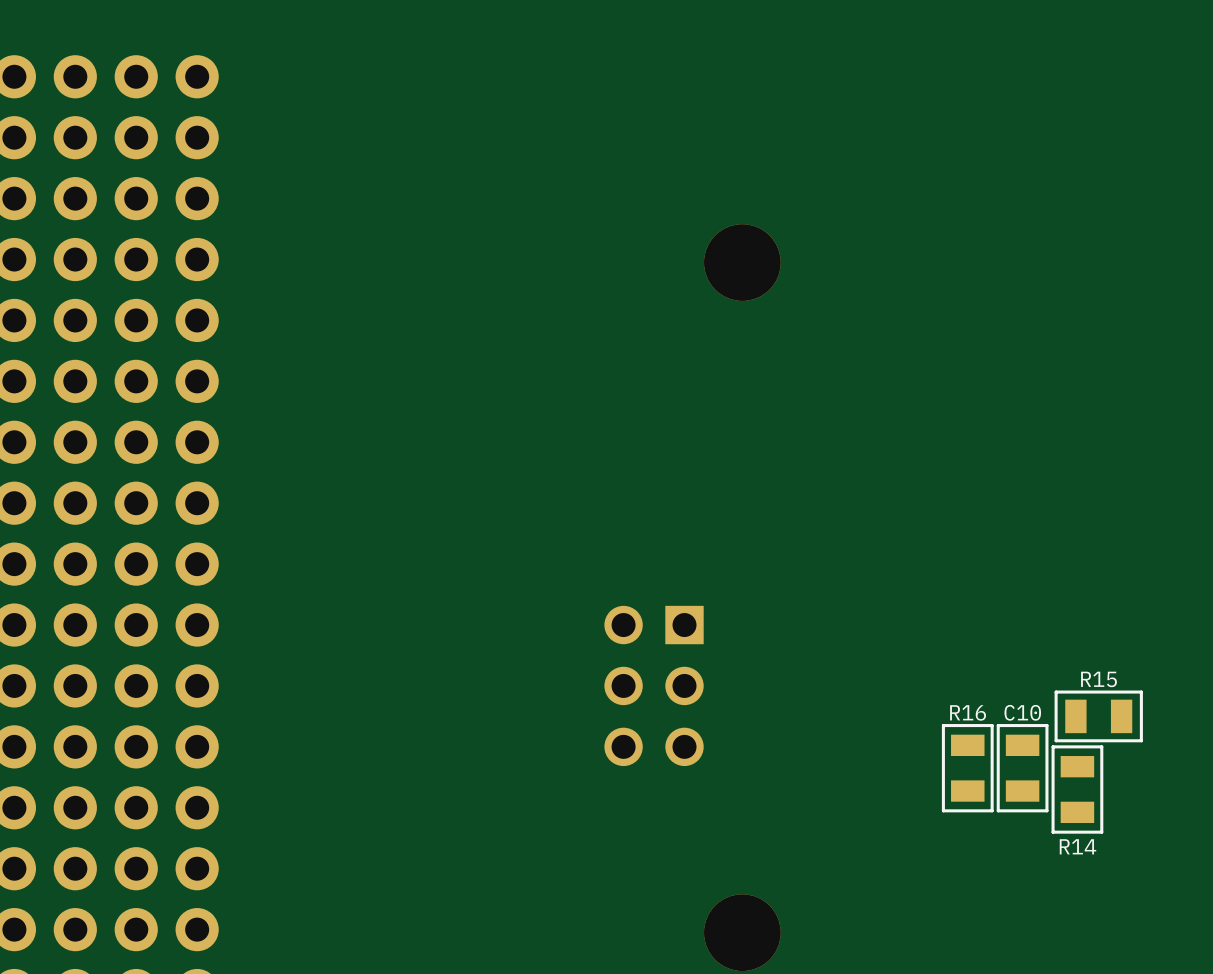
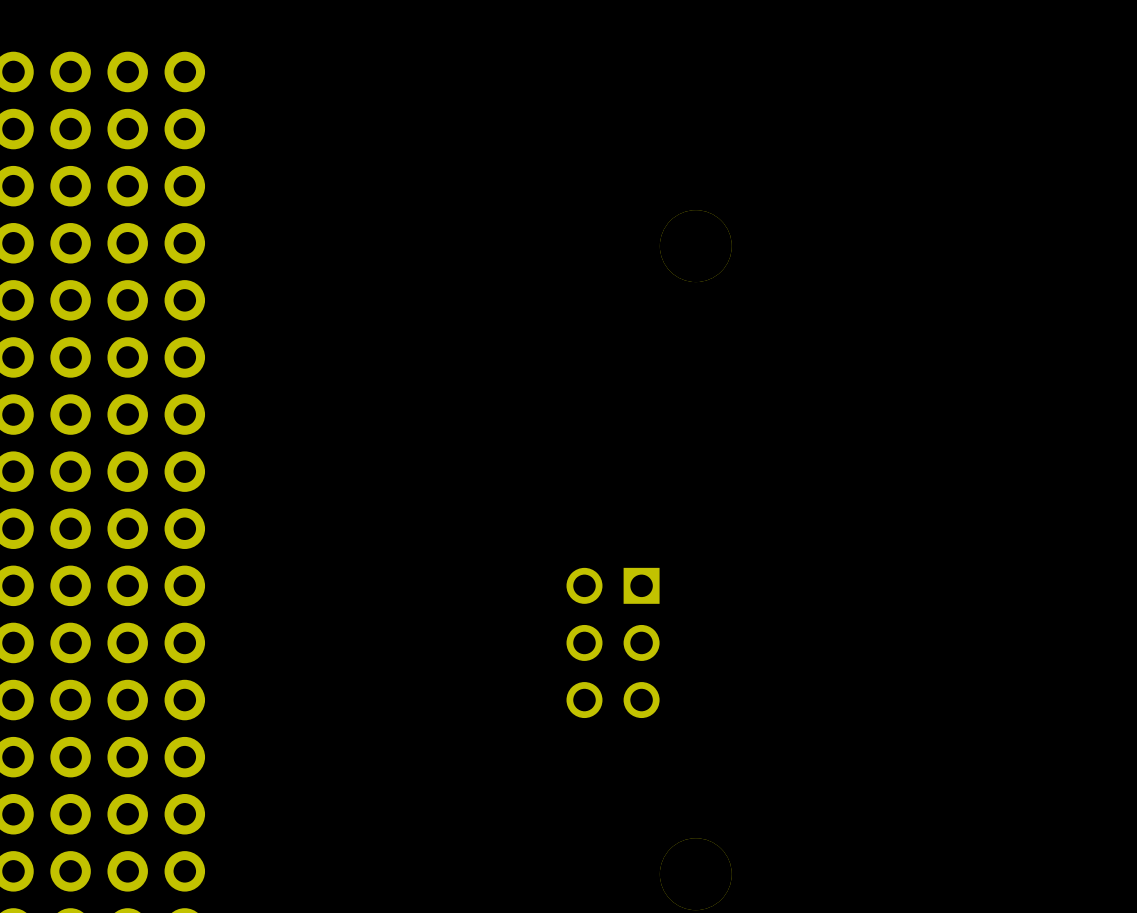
R15: (1098, 716) -> none
R16: (967, 768) -> none
C10: (1022, 768) -> none
R14: (1077, 789) -> none

